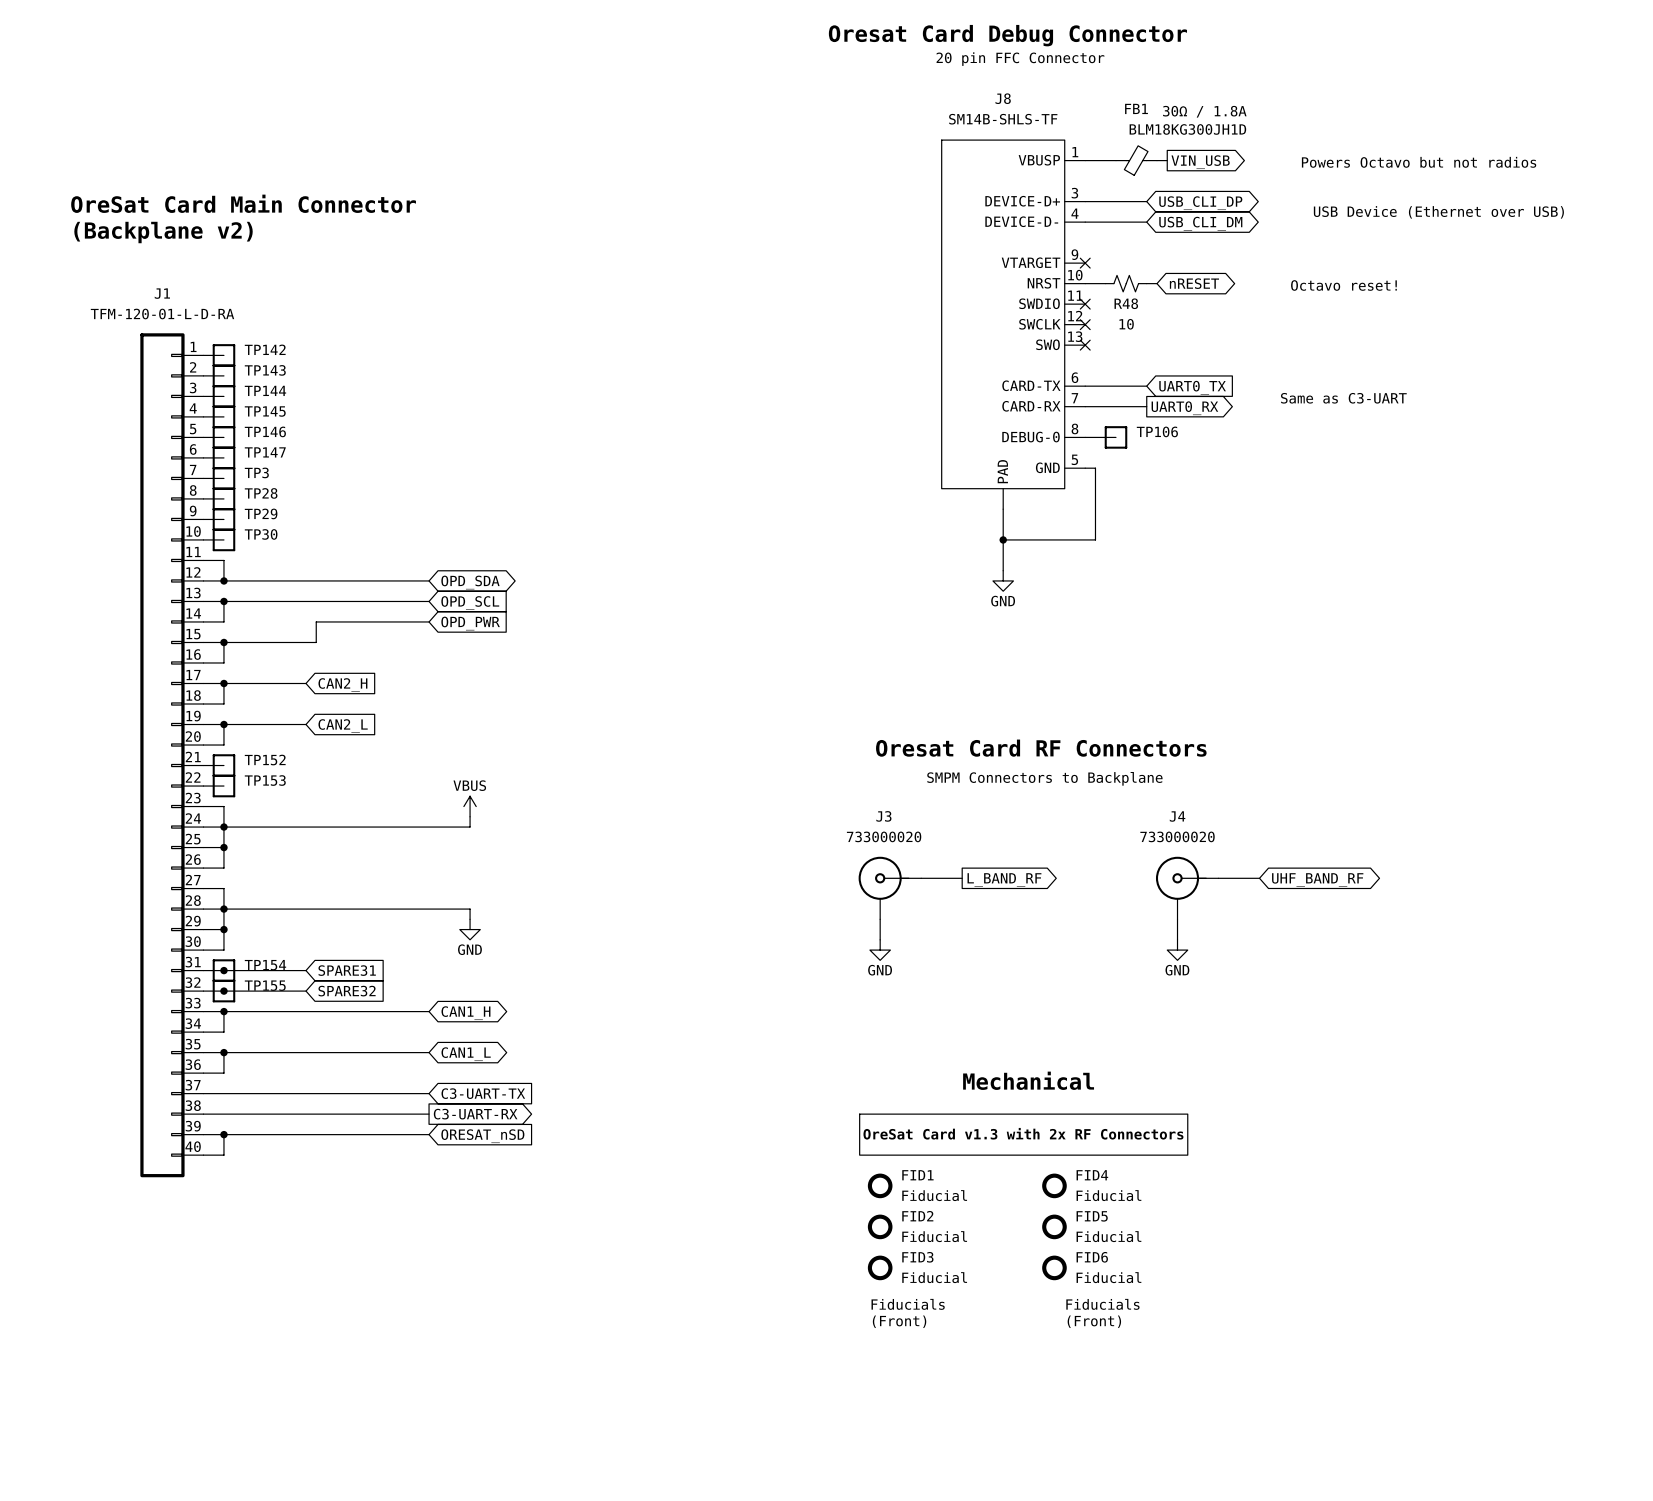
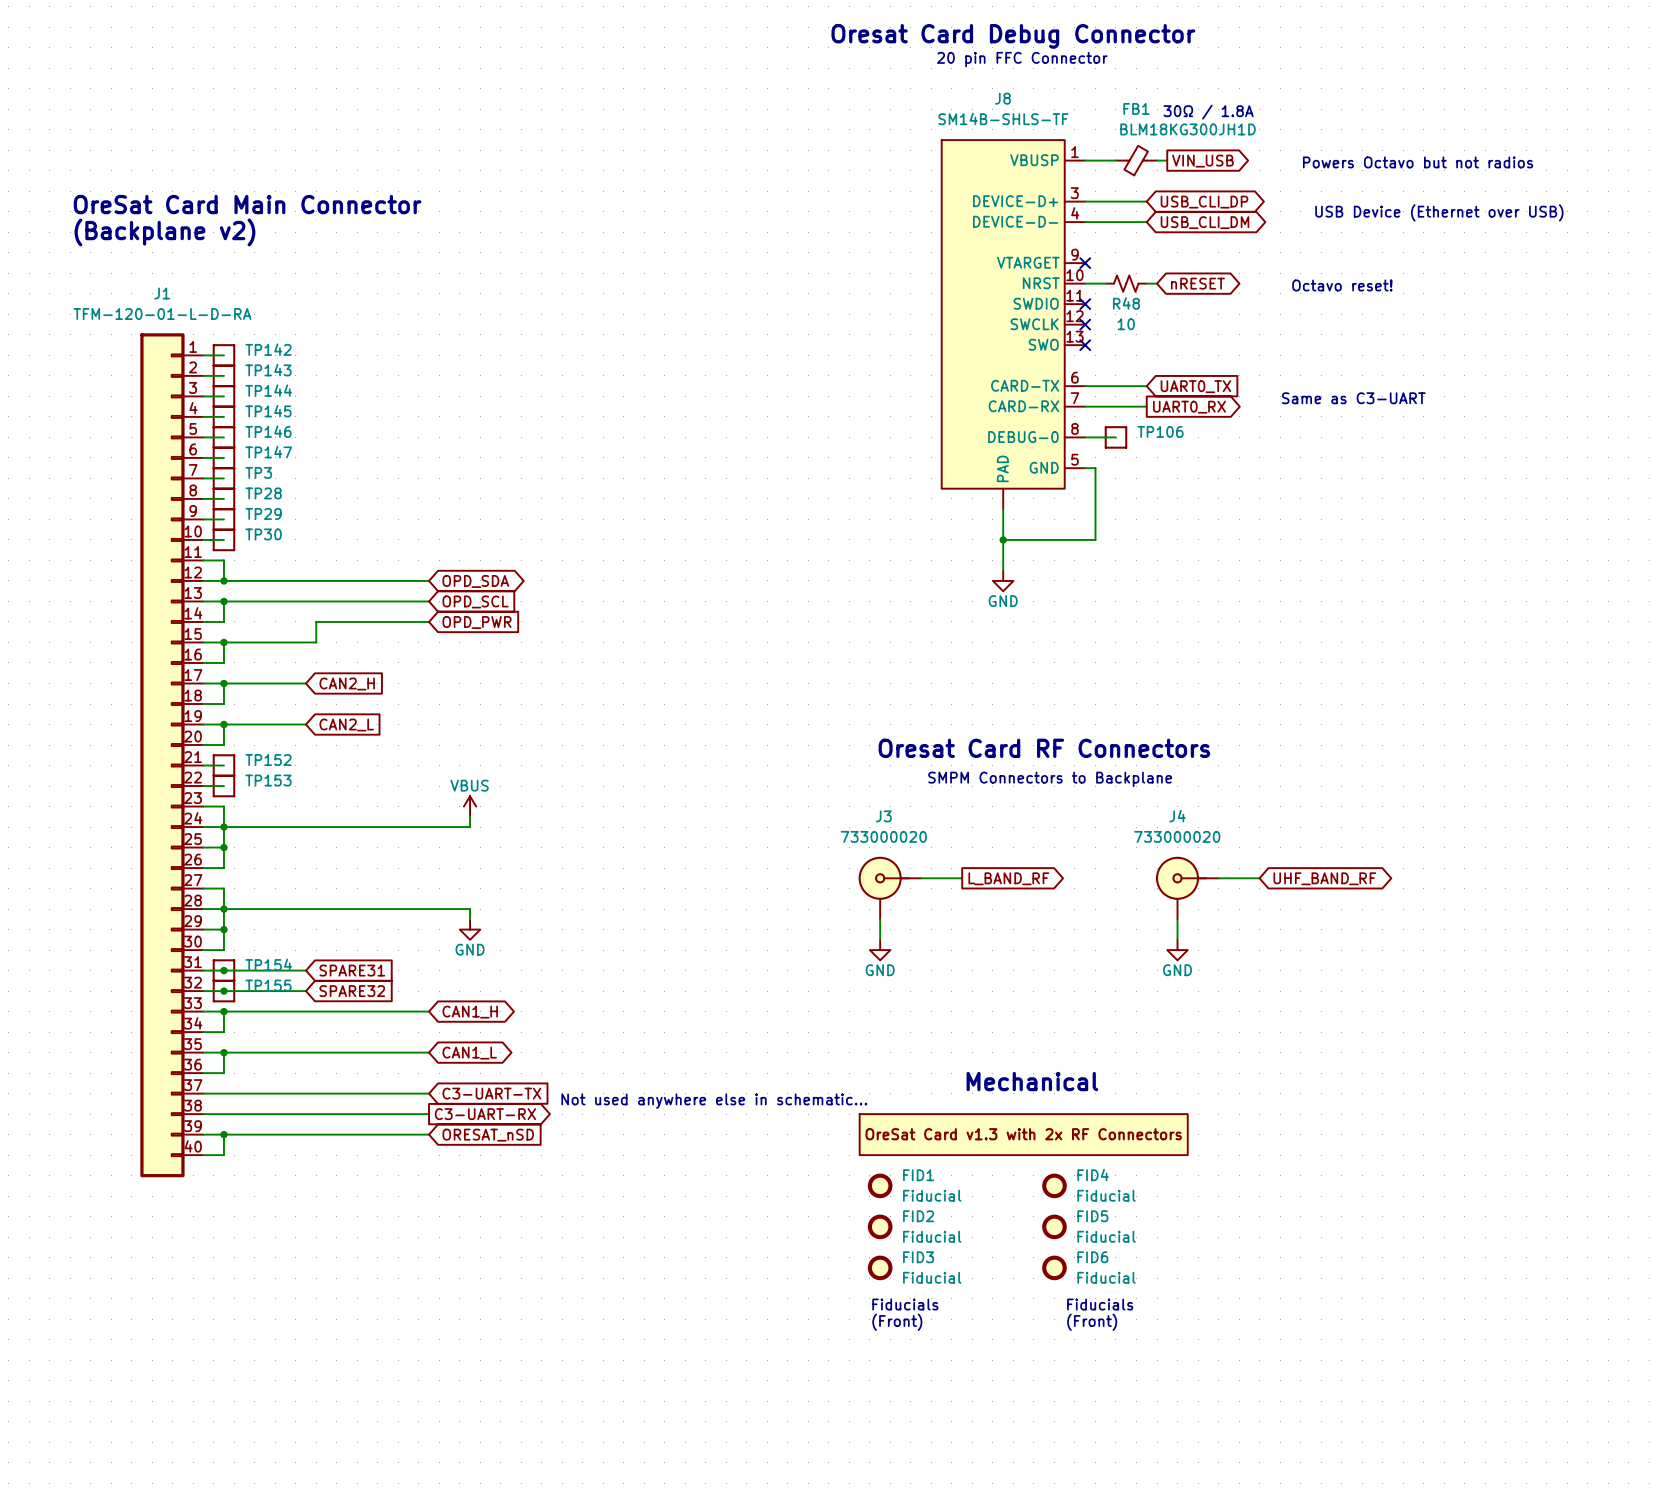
text: none -> Not used anywhere else in schematic... (714, 1101)

